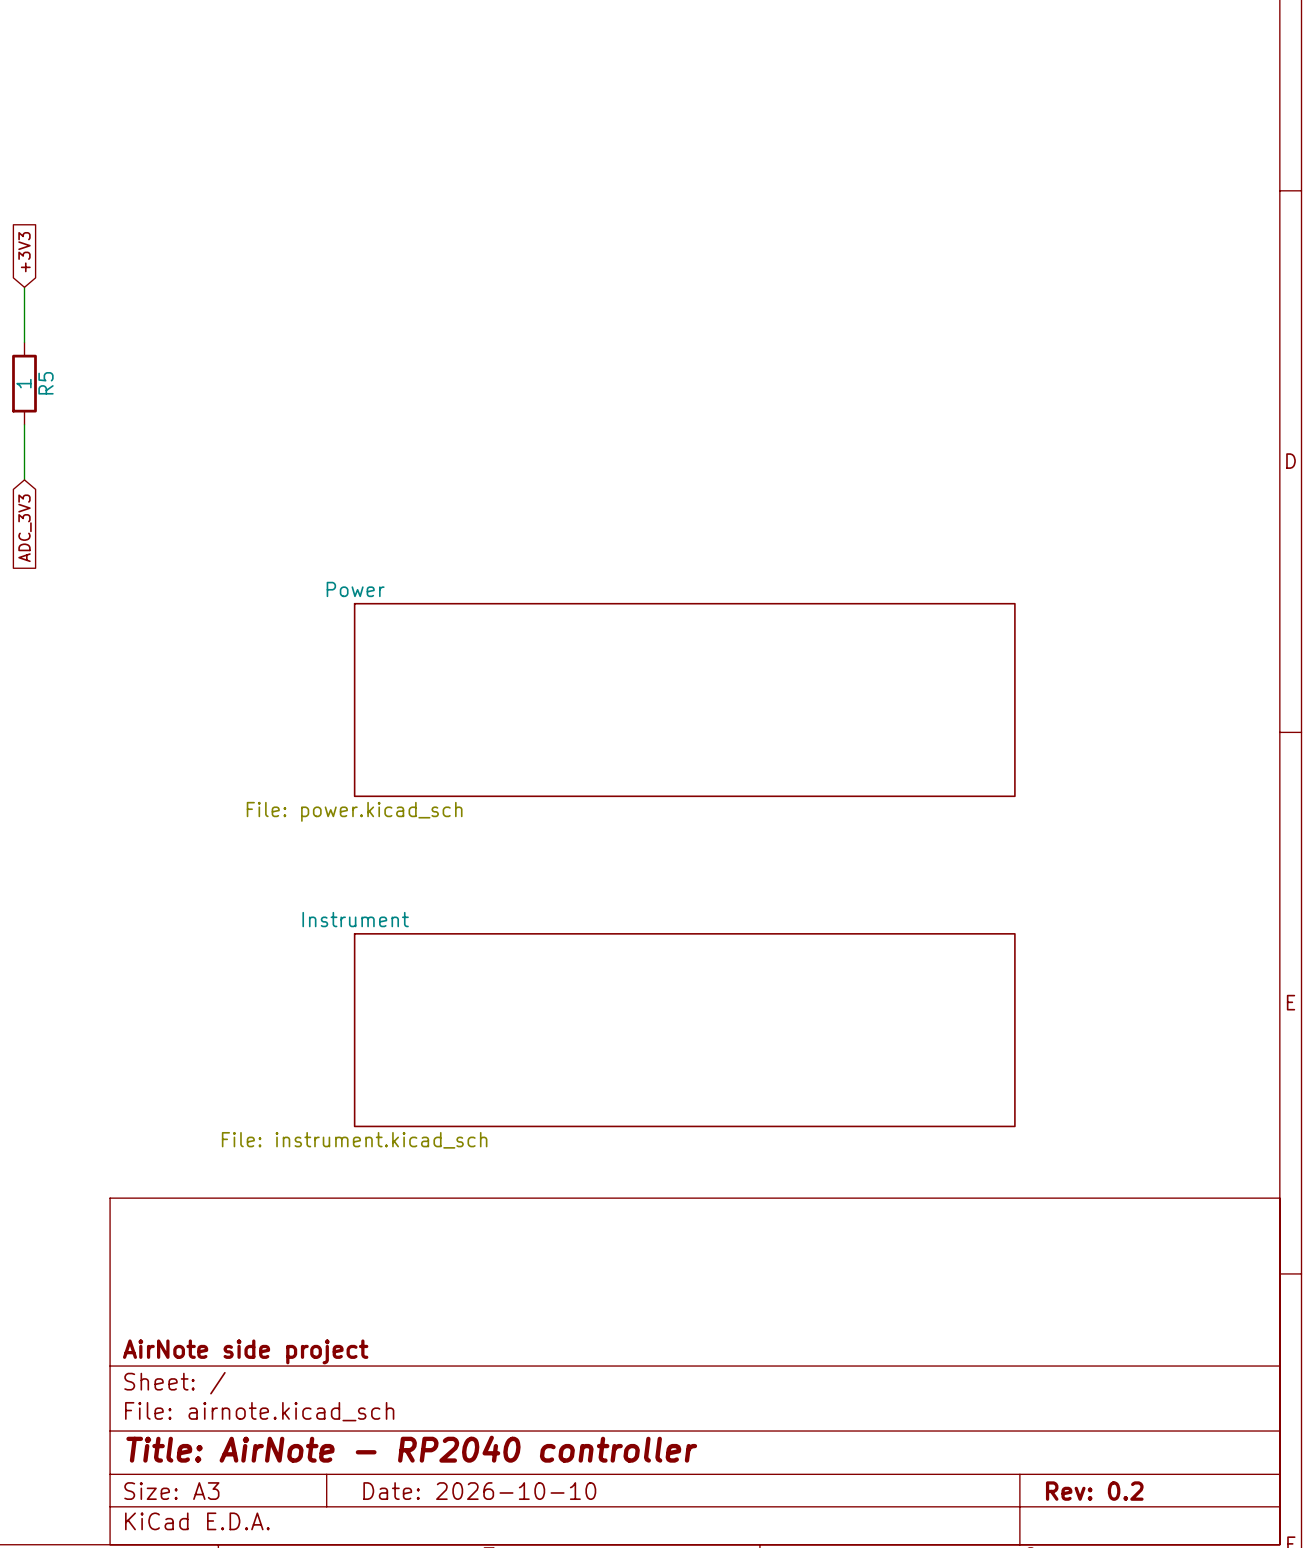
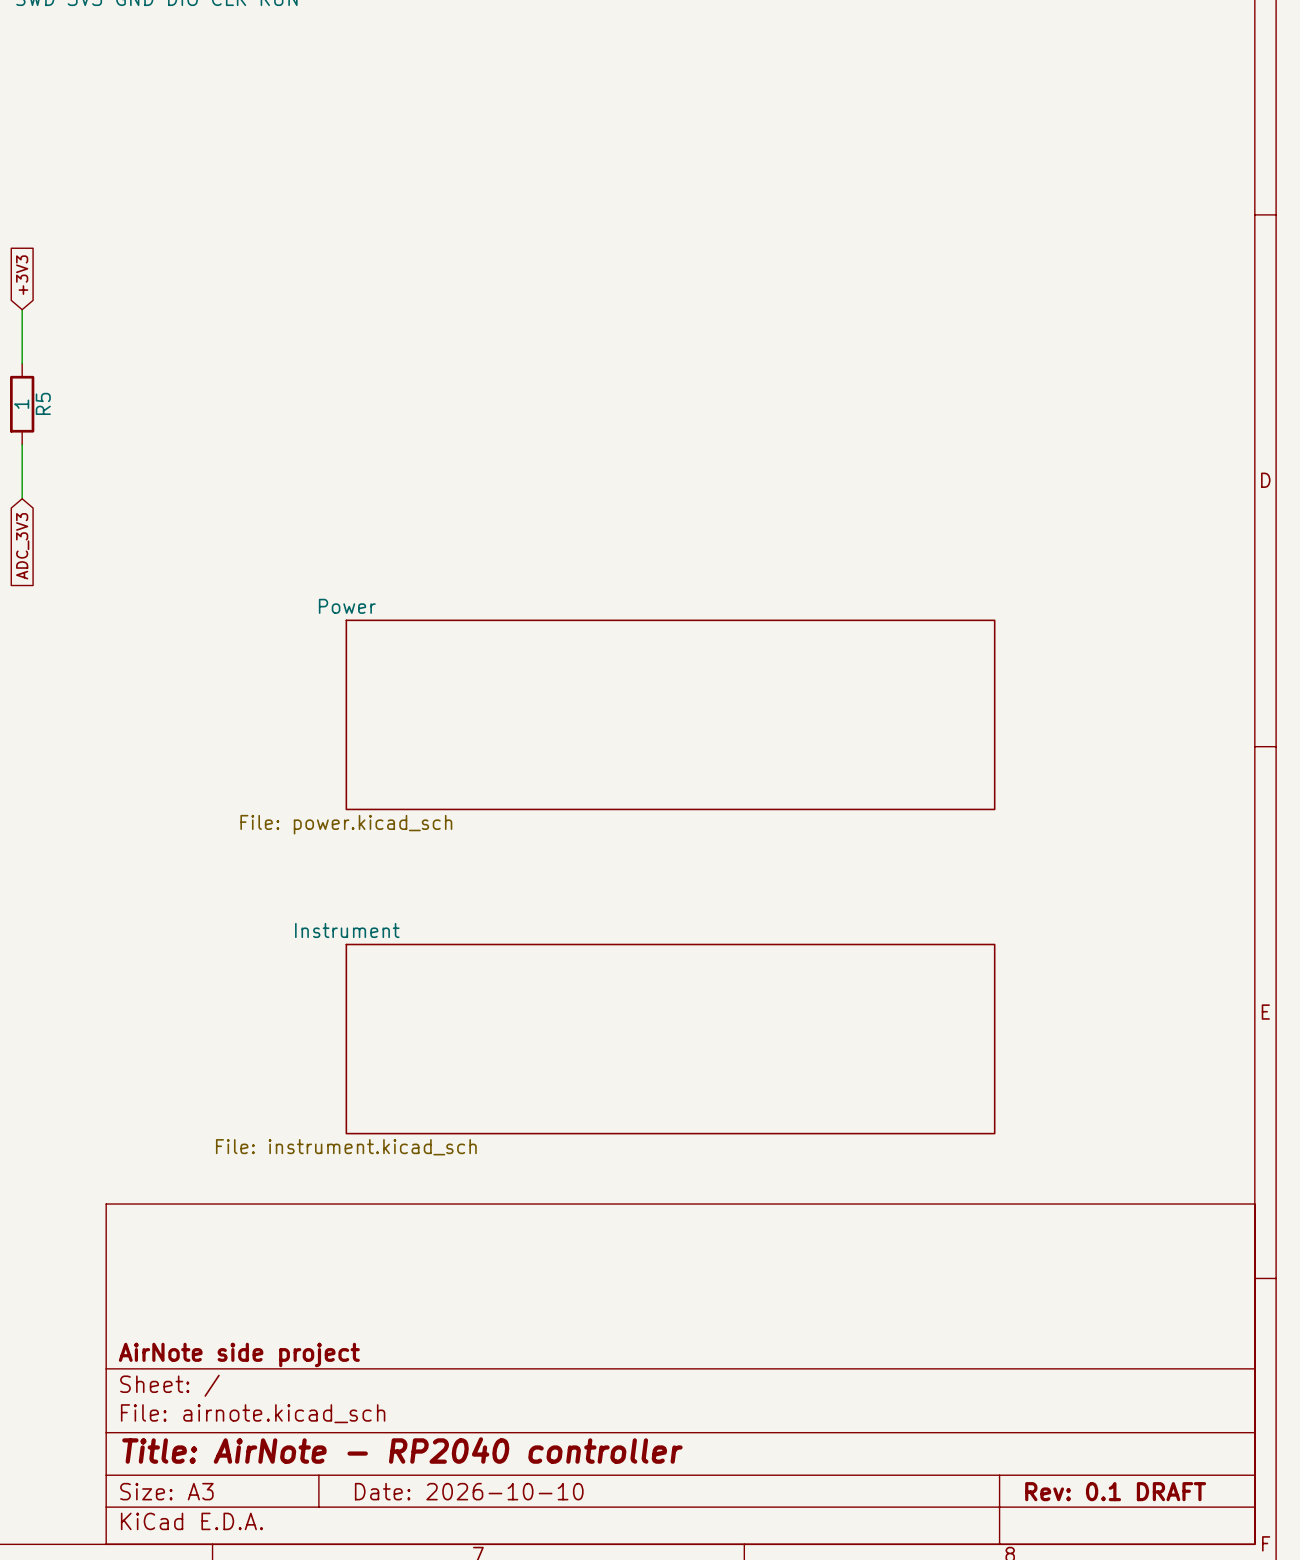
title block: Rev: 0.2 (1094, 1491) -> Rev: 0.1 DRAFT (1115, 1491)

